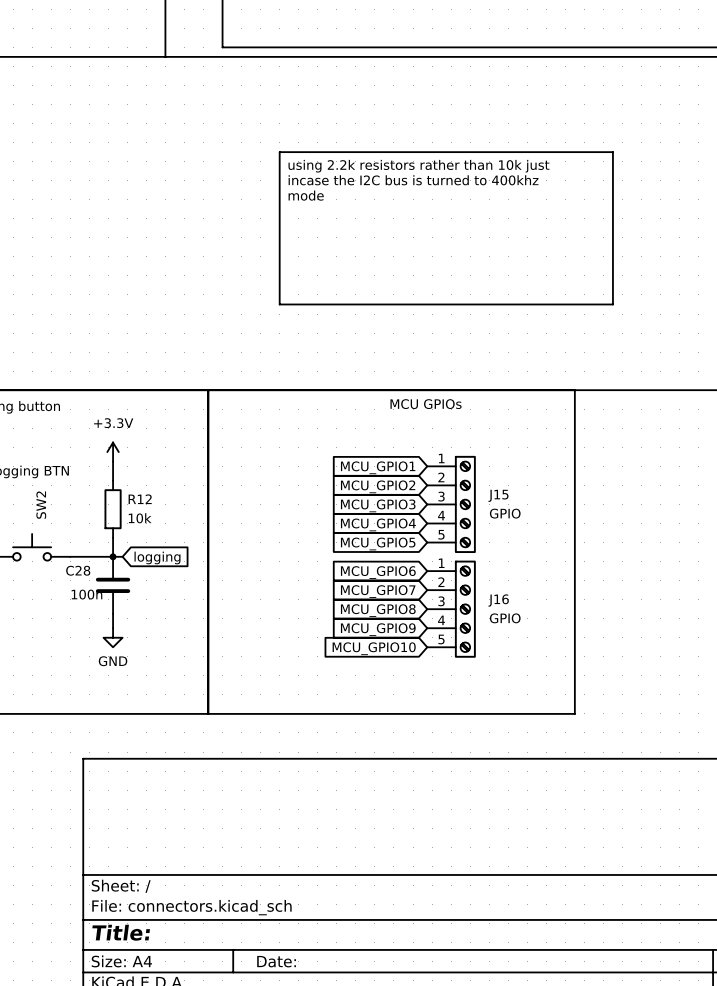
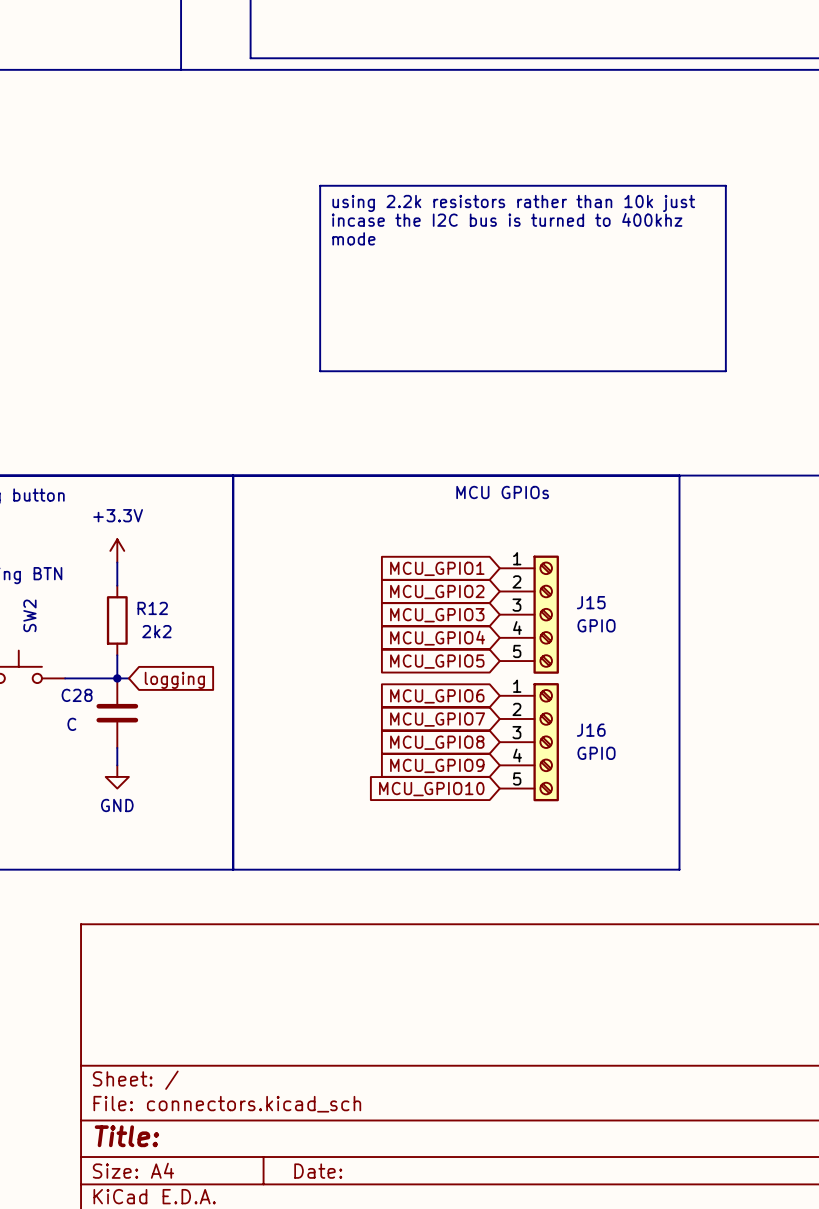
R12 value: 10k (140, 518) -> 2k2 (156, 631)
C28 value: 100n (86, 594) -> C (71, 724)

